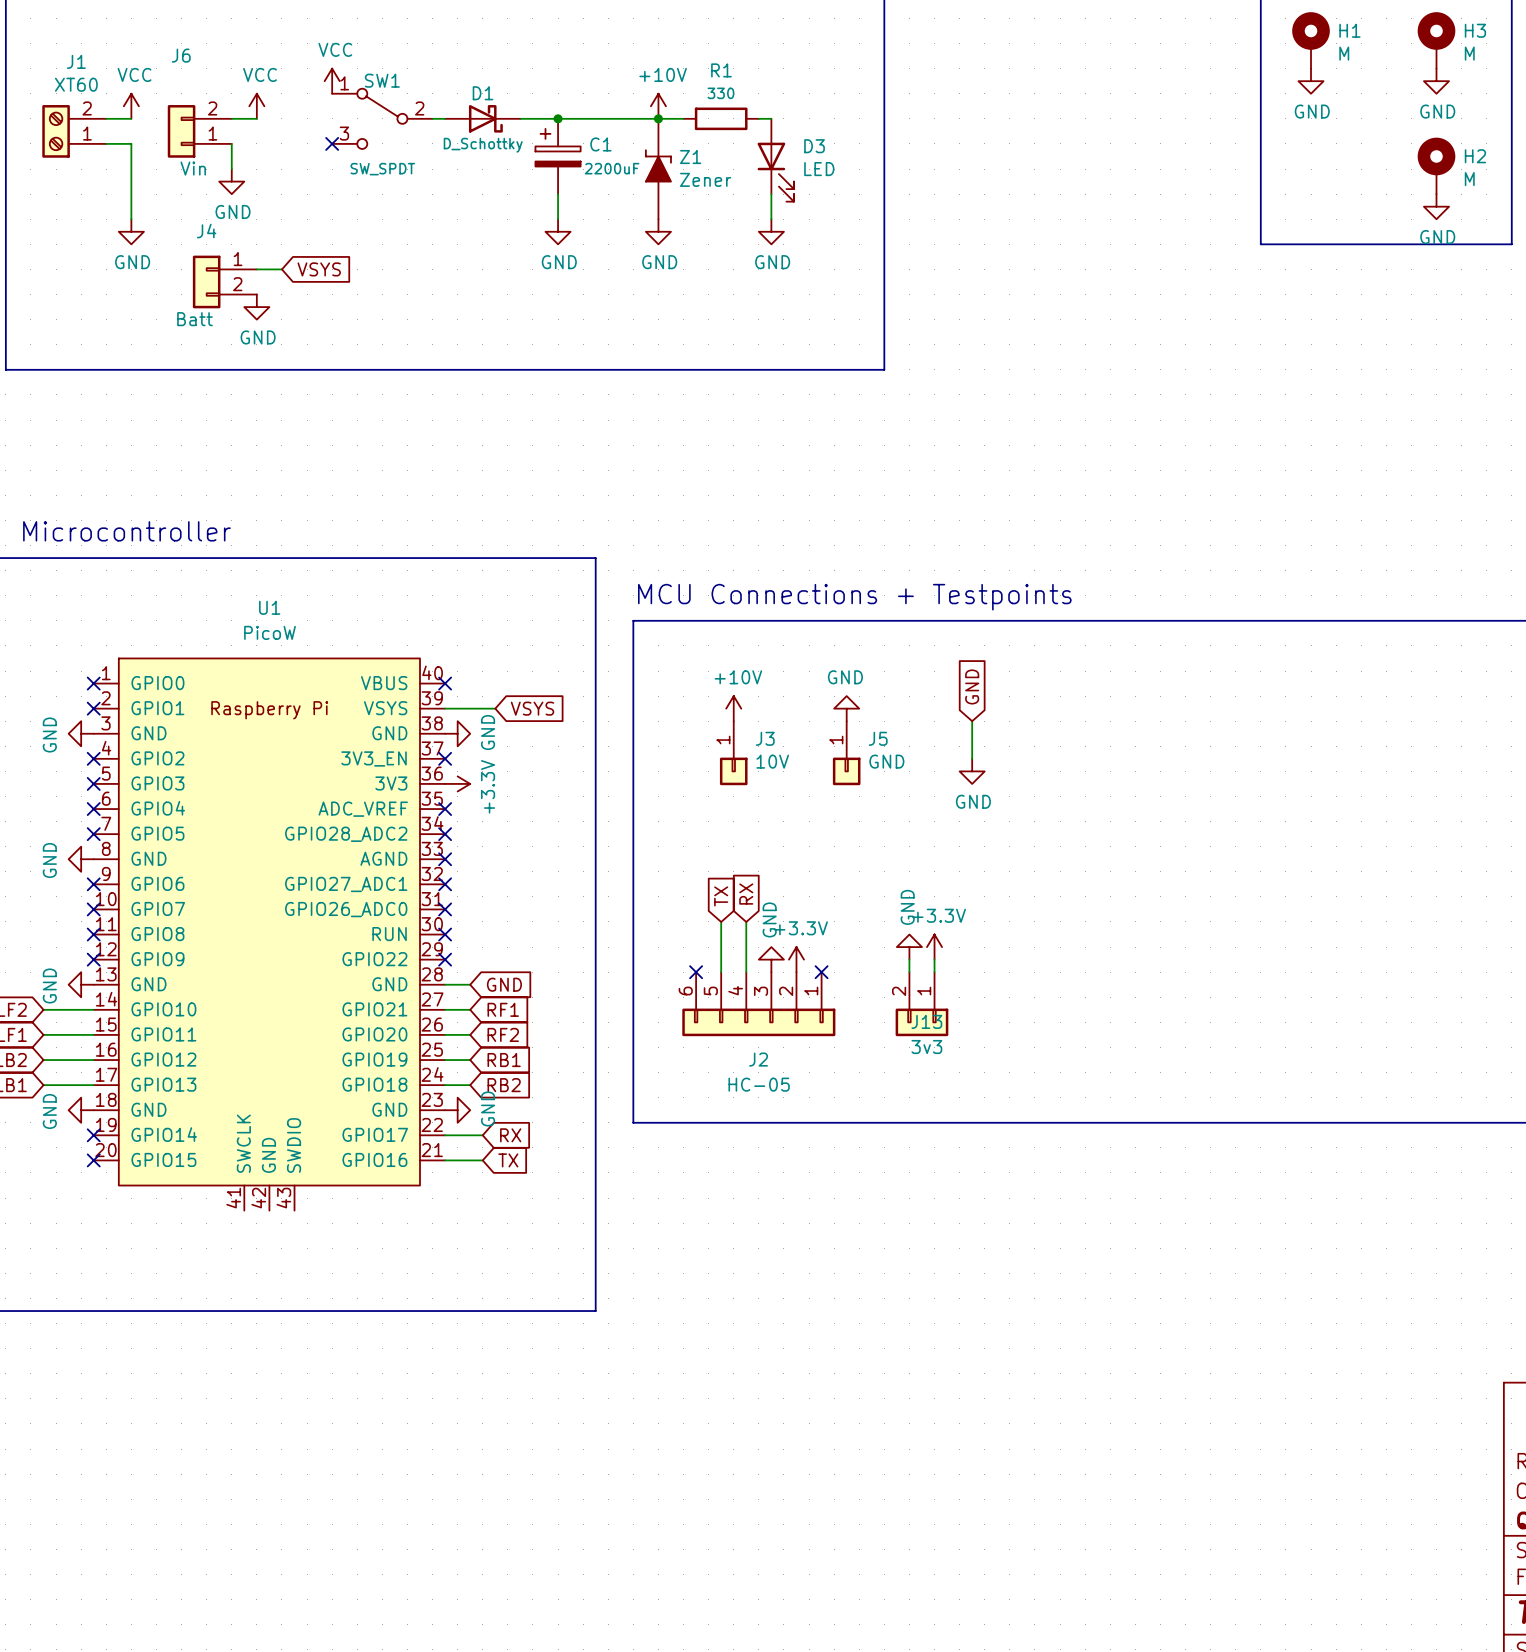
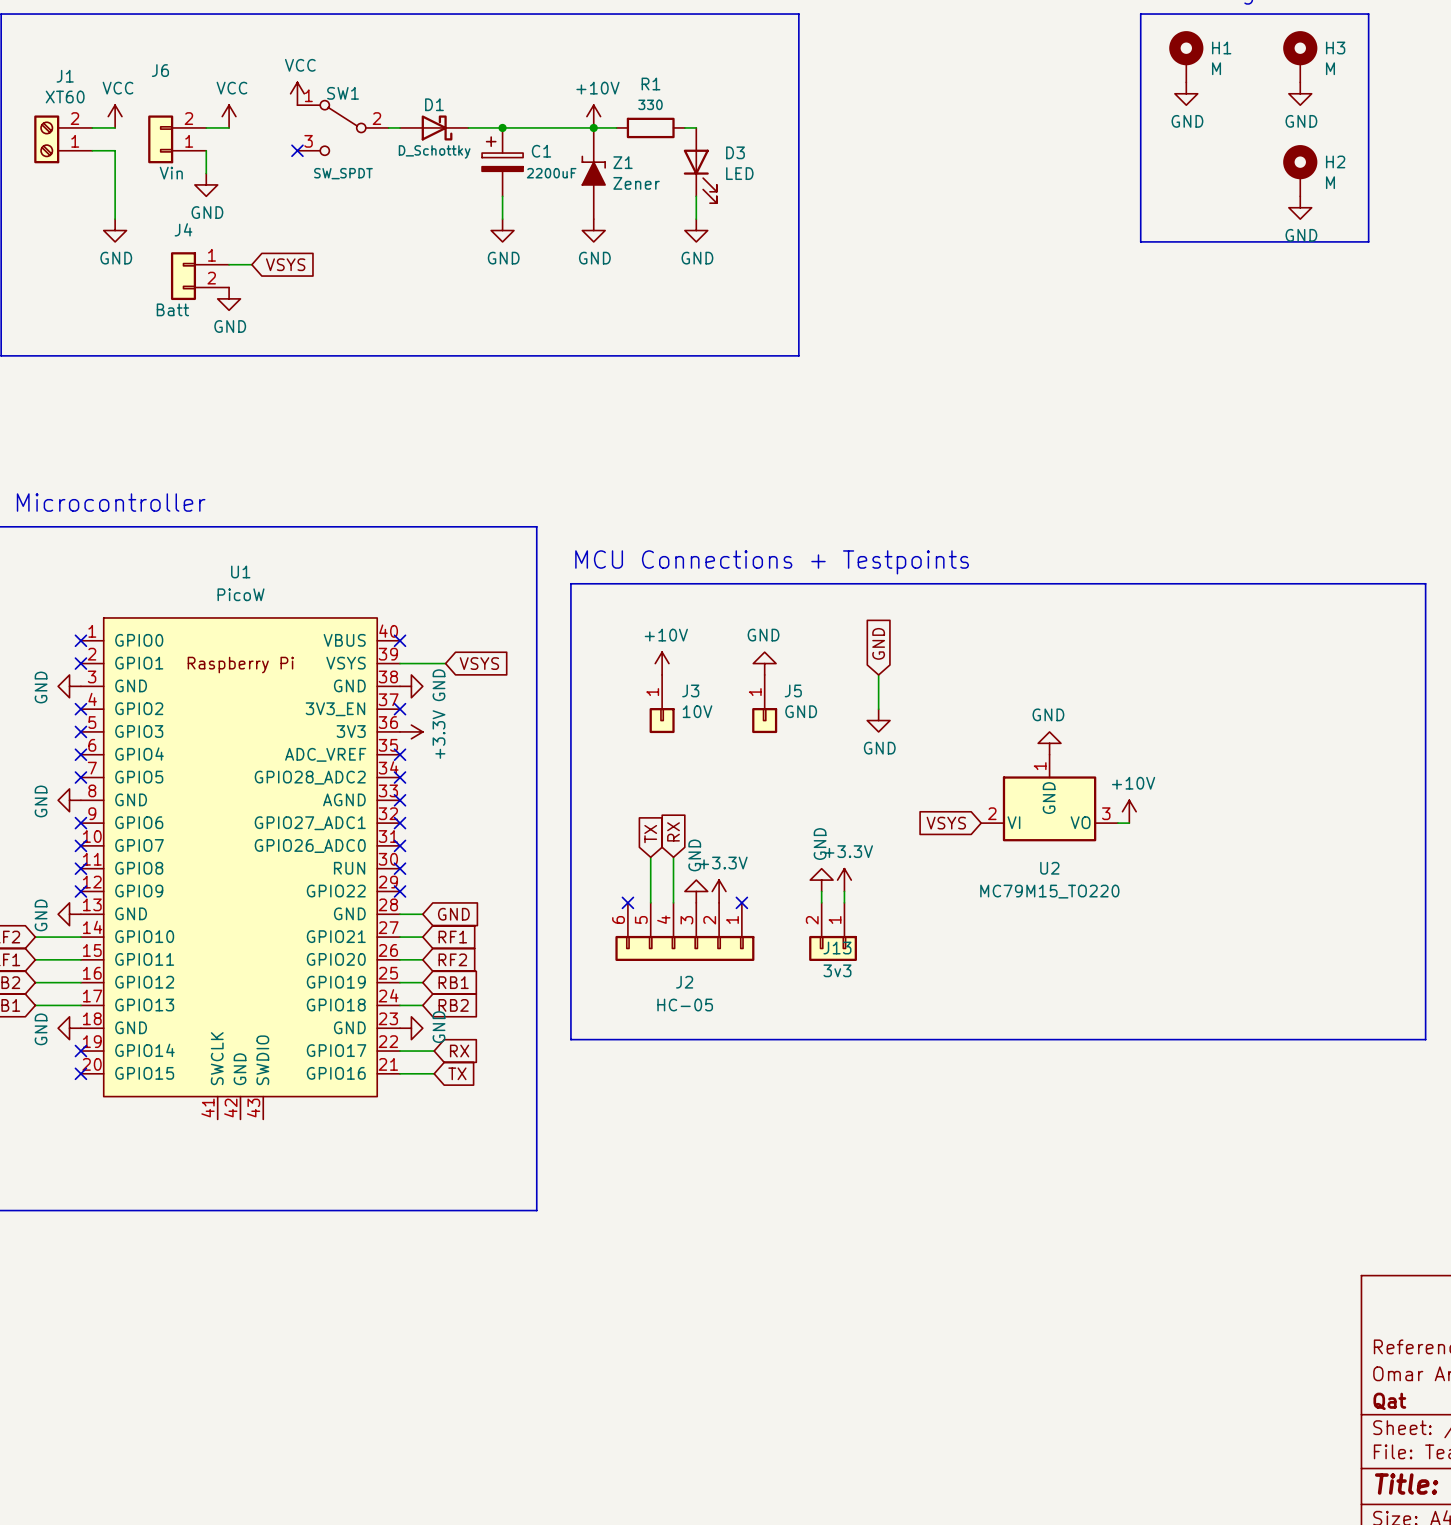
power symbol: none -> GND (1049, 743)
U2: none -> MC79M15_TO220 (1049, 798)
power symbol: none -> +10V (1129, 811)
global label: none -> VSYS (946, 823)
wire: none -> (1117, 823) (1129, 823)

